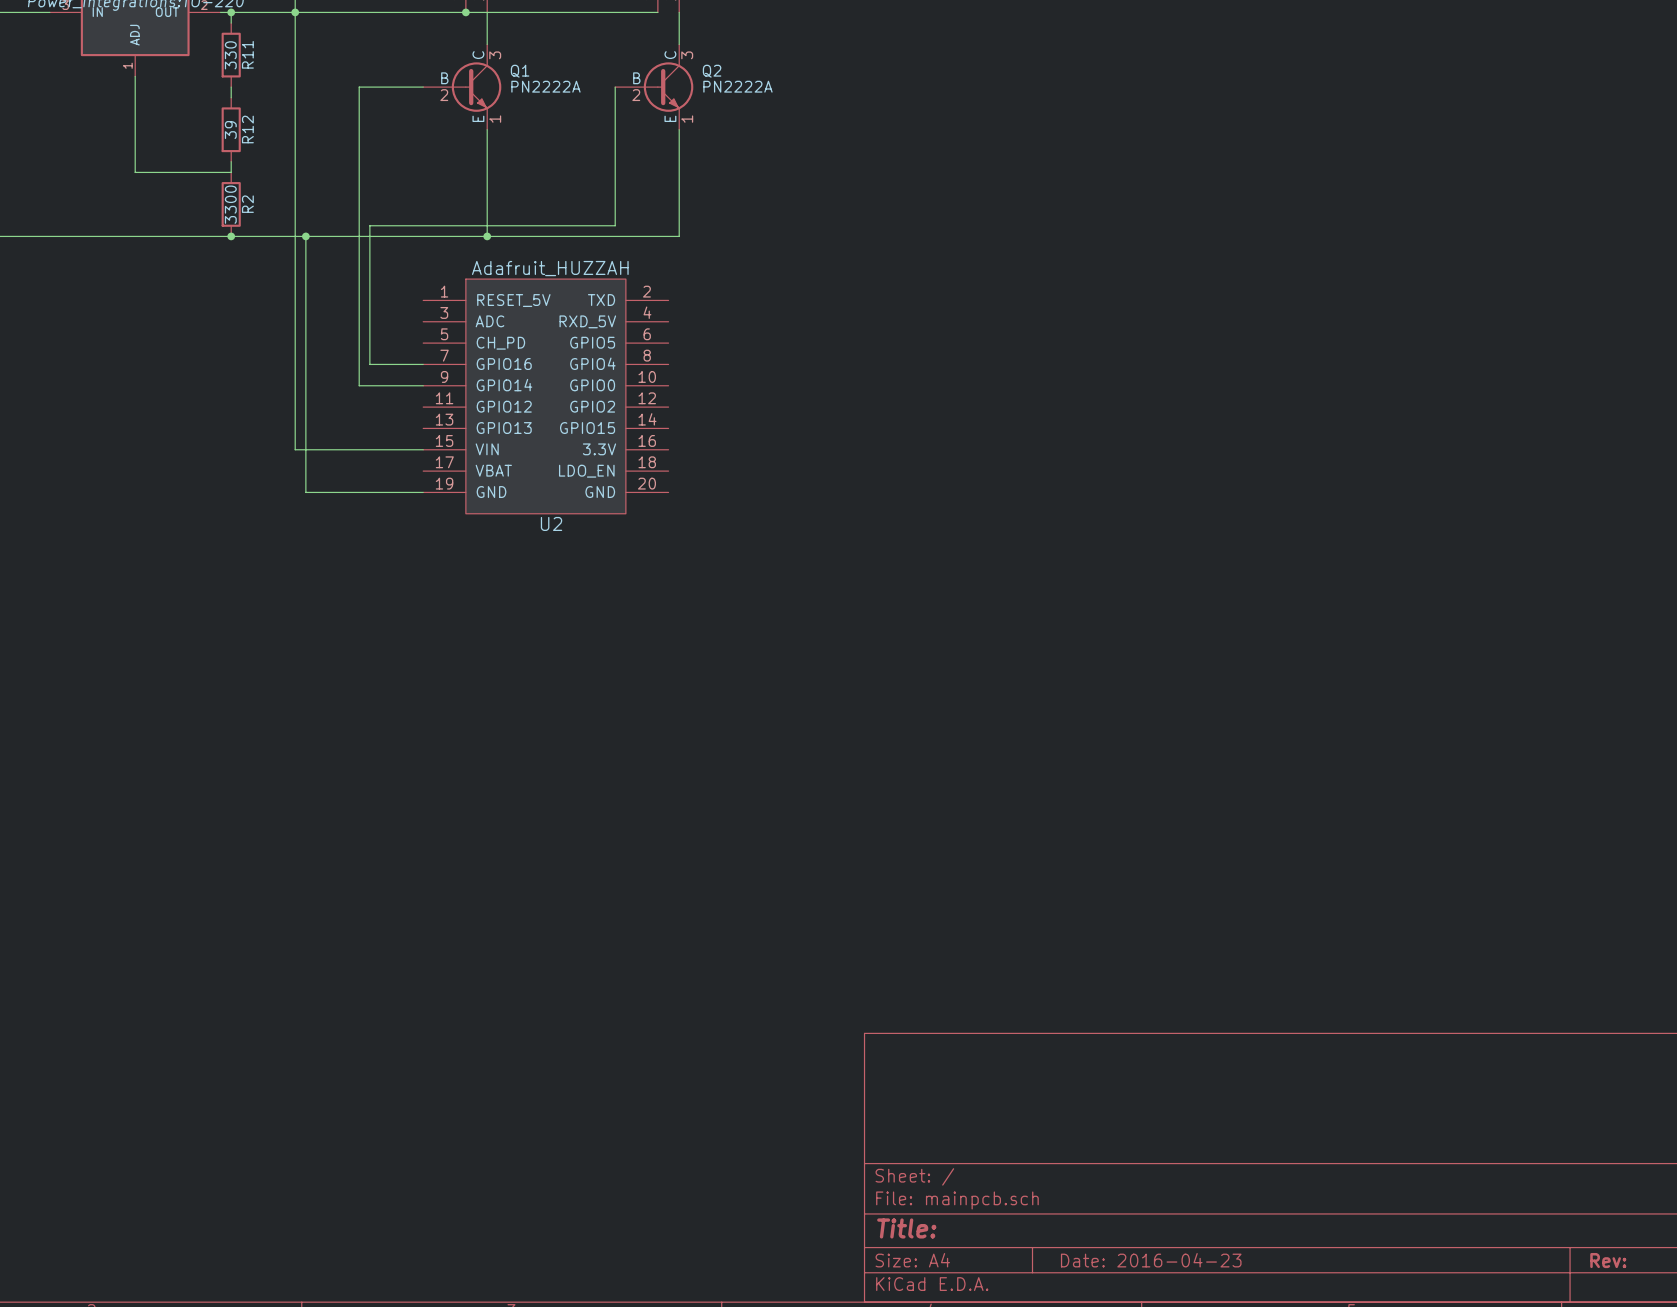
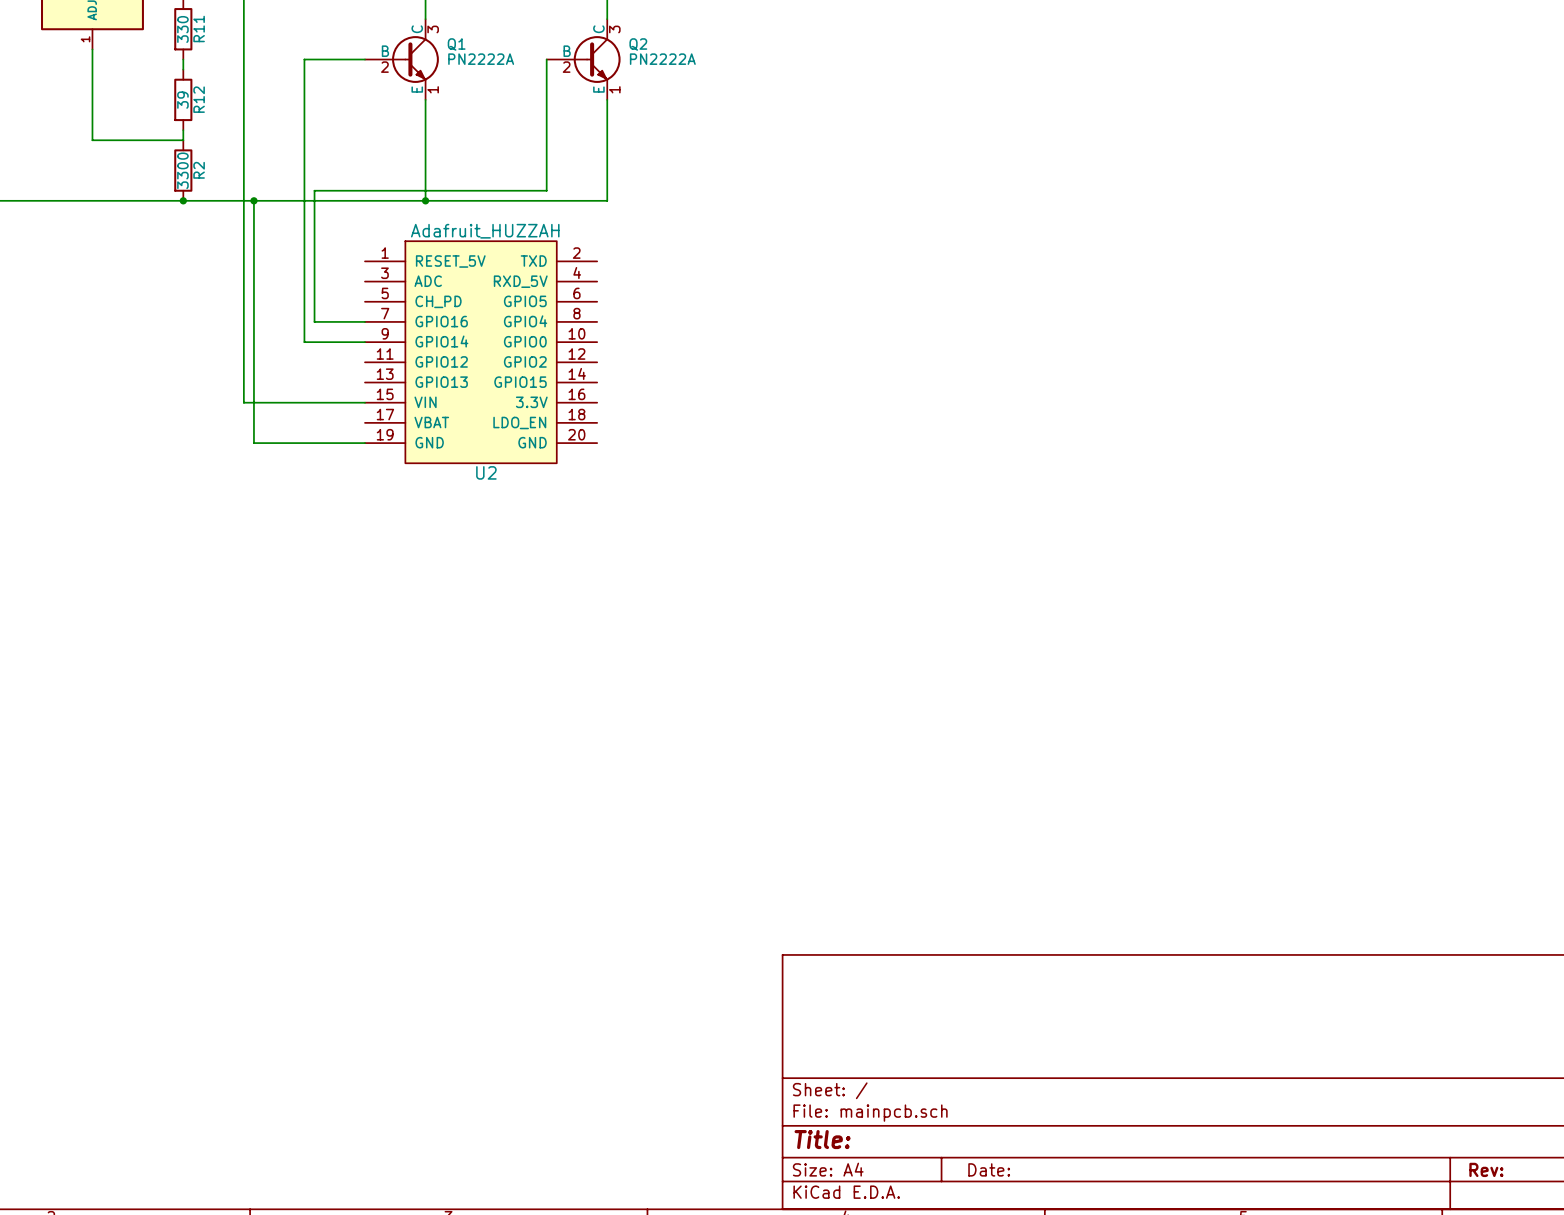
title block: Date: 2016-04-23 (1151, 1260) -> Date: (989, 1169)

